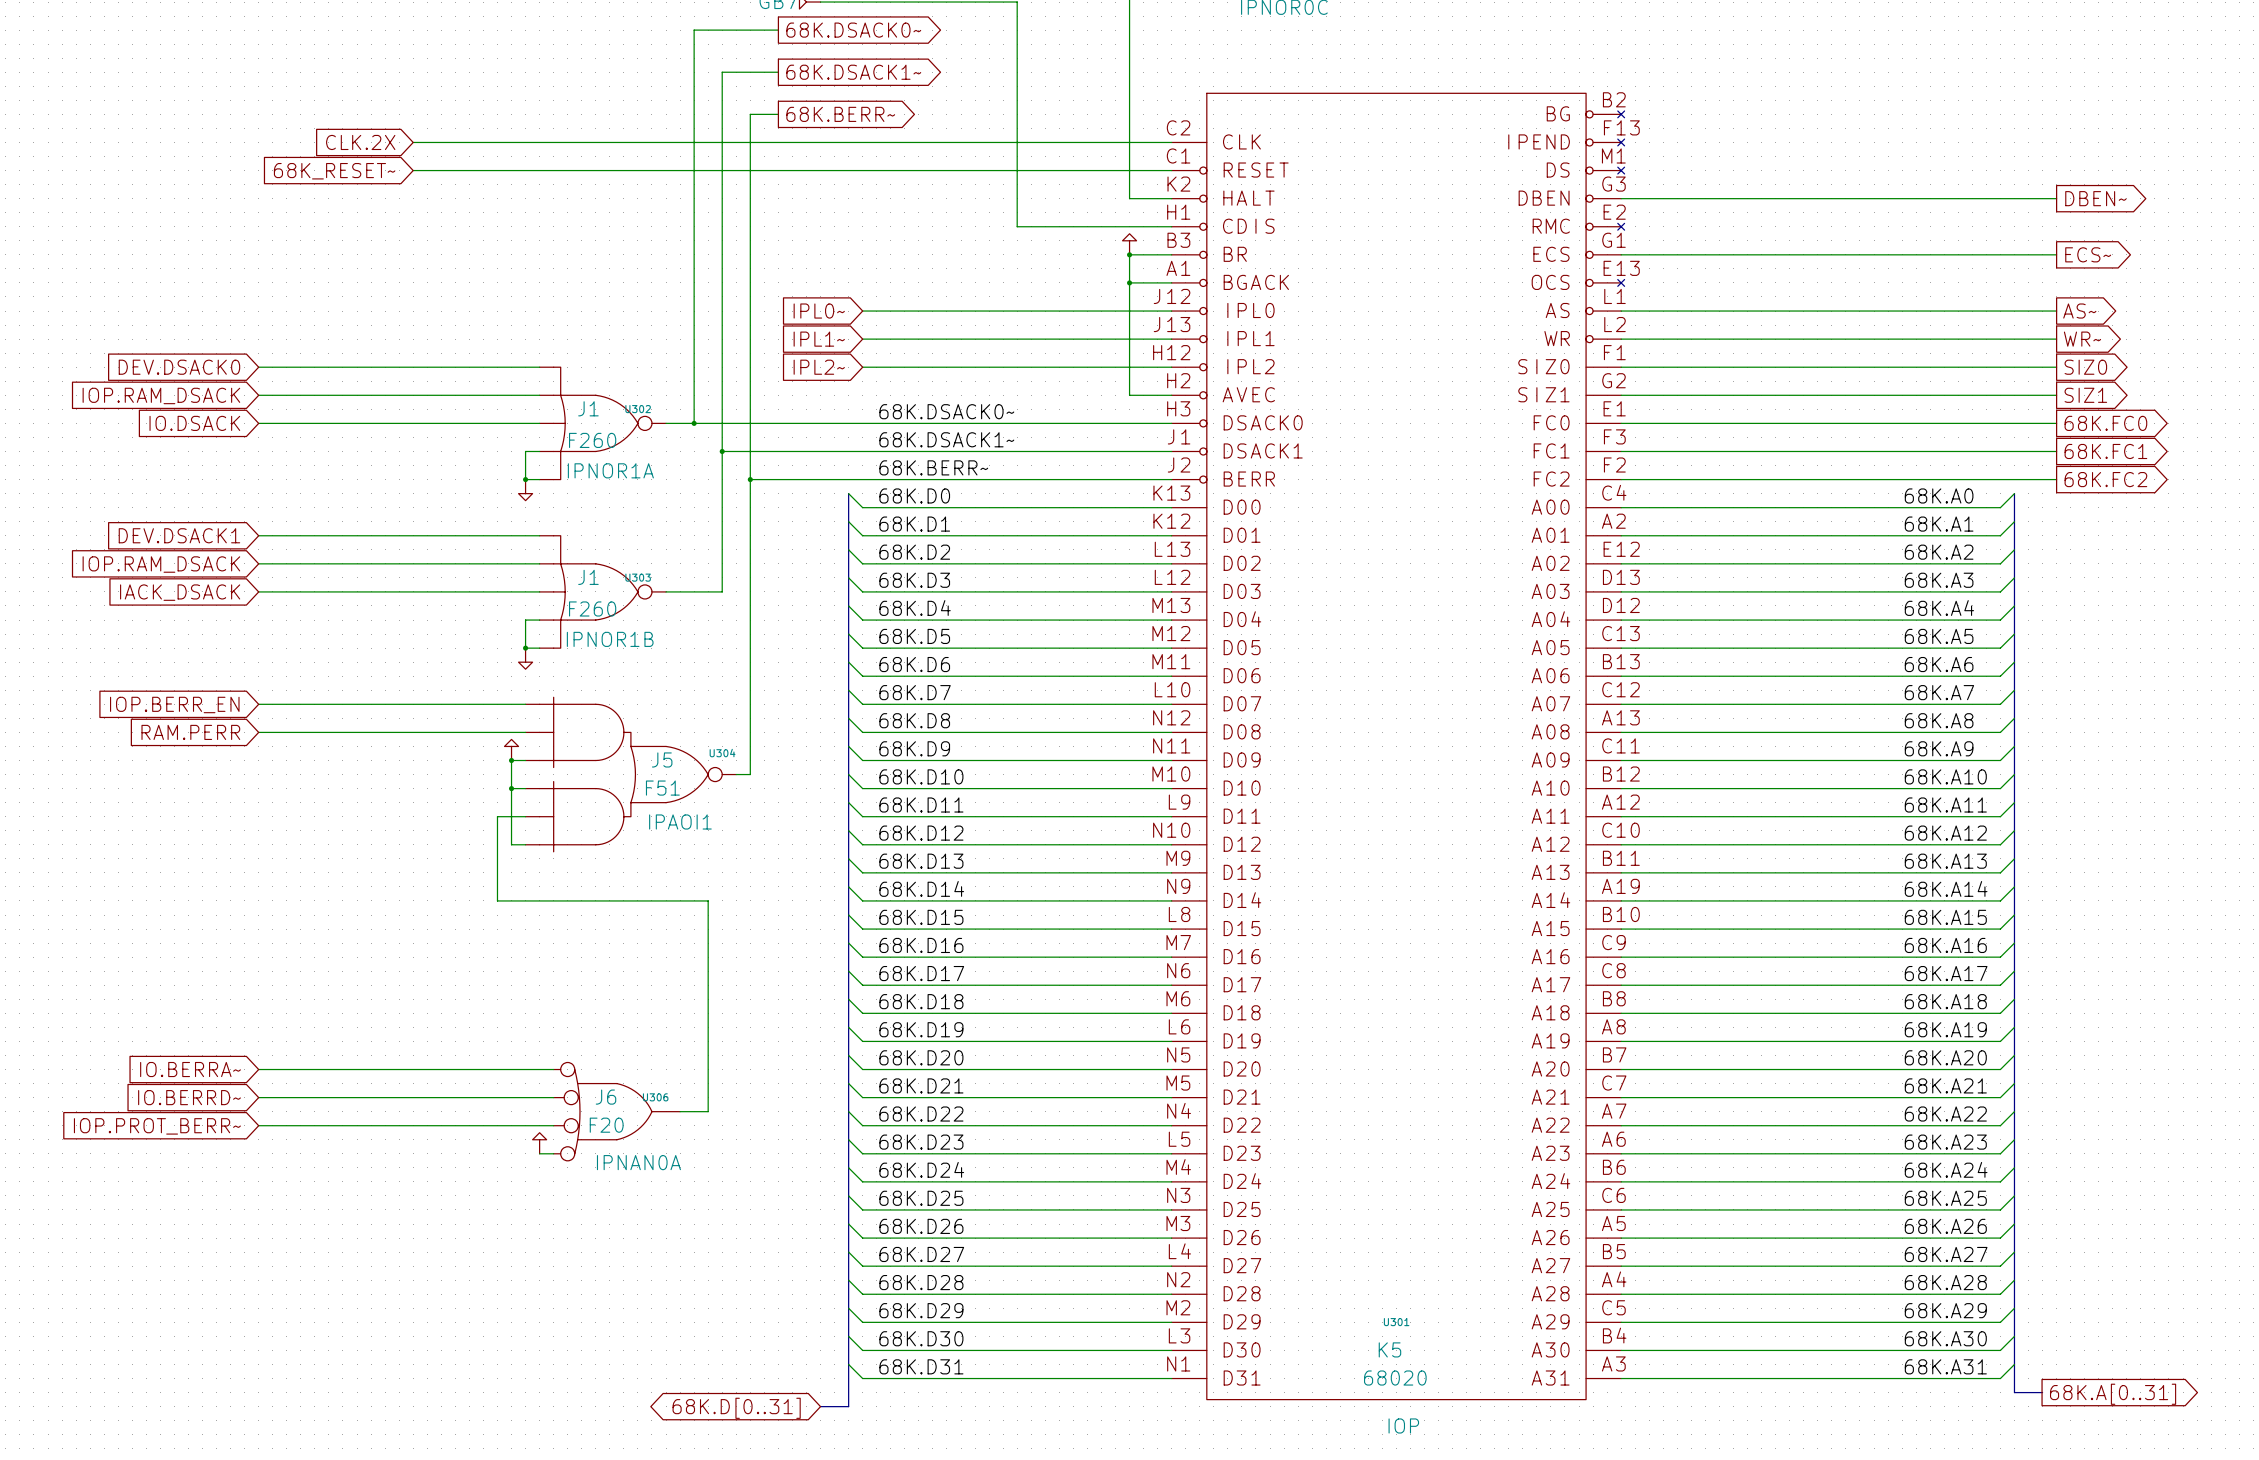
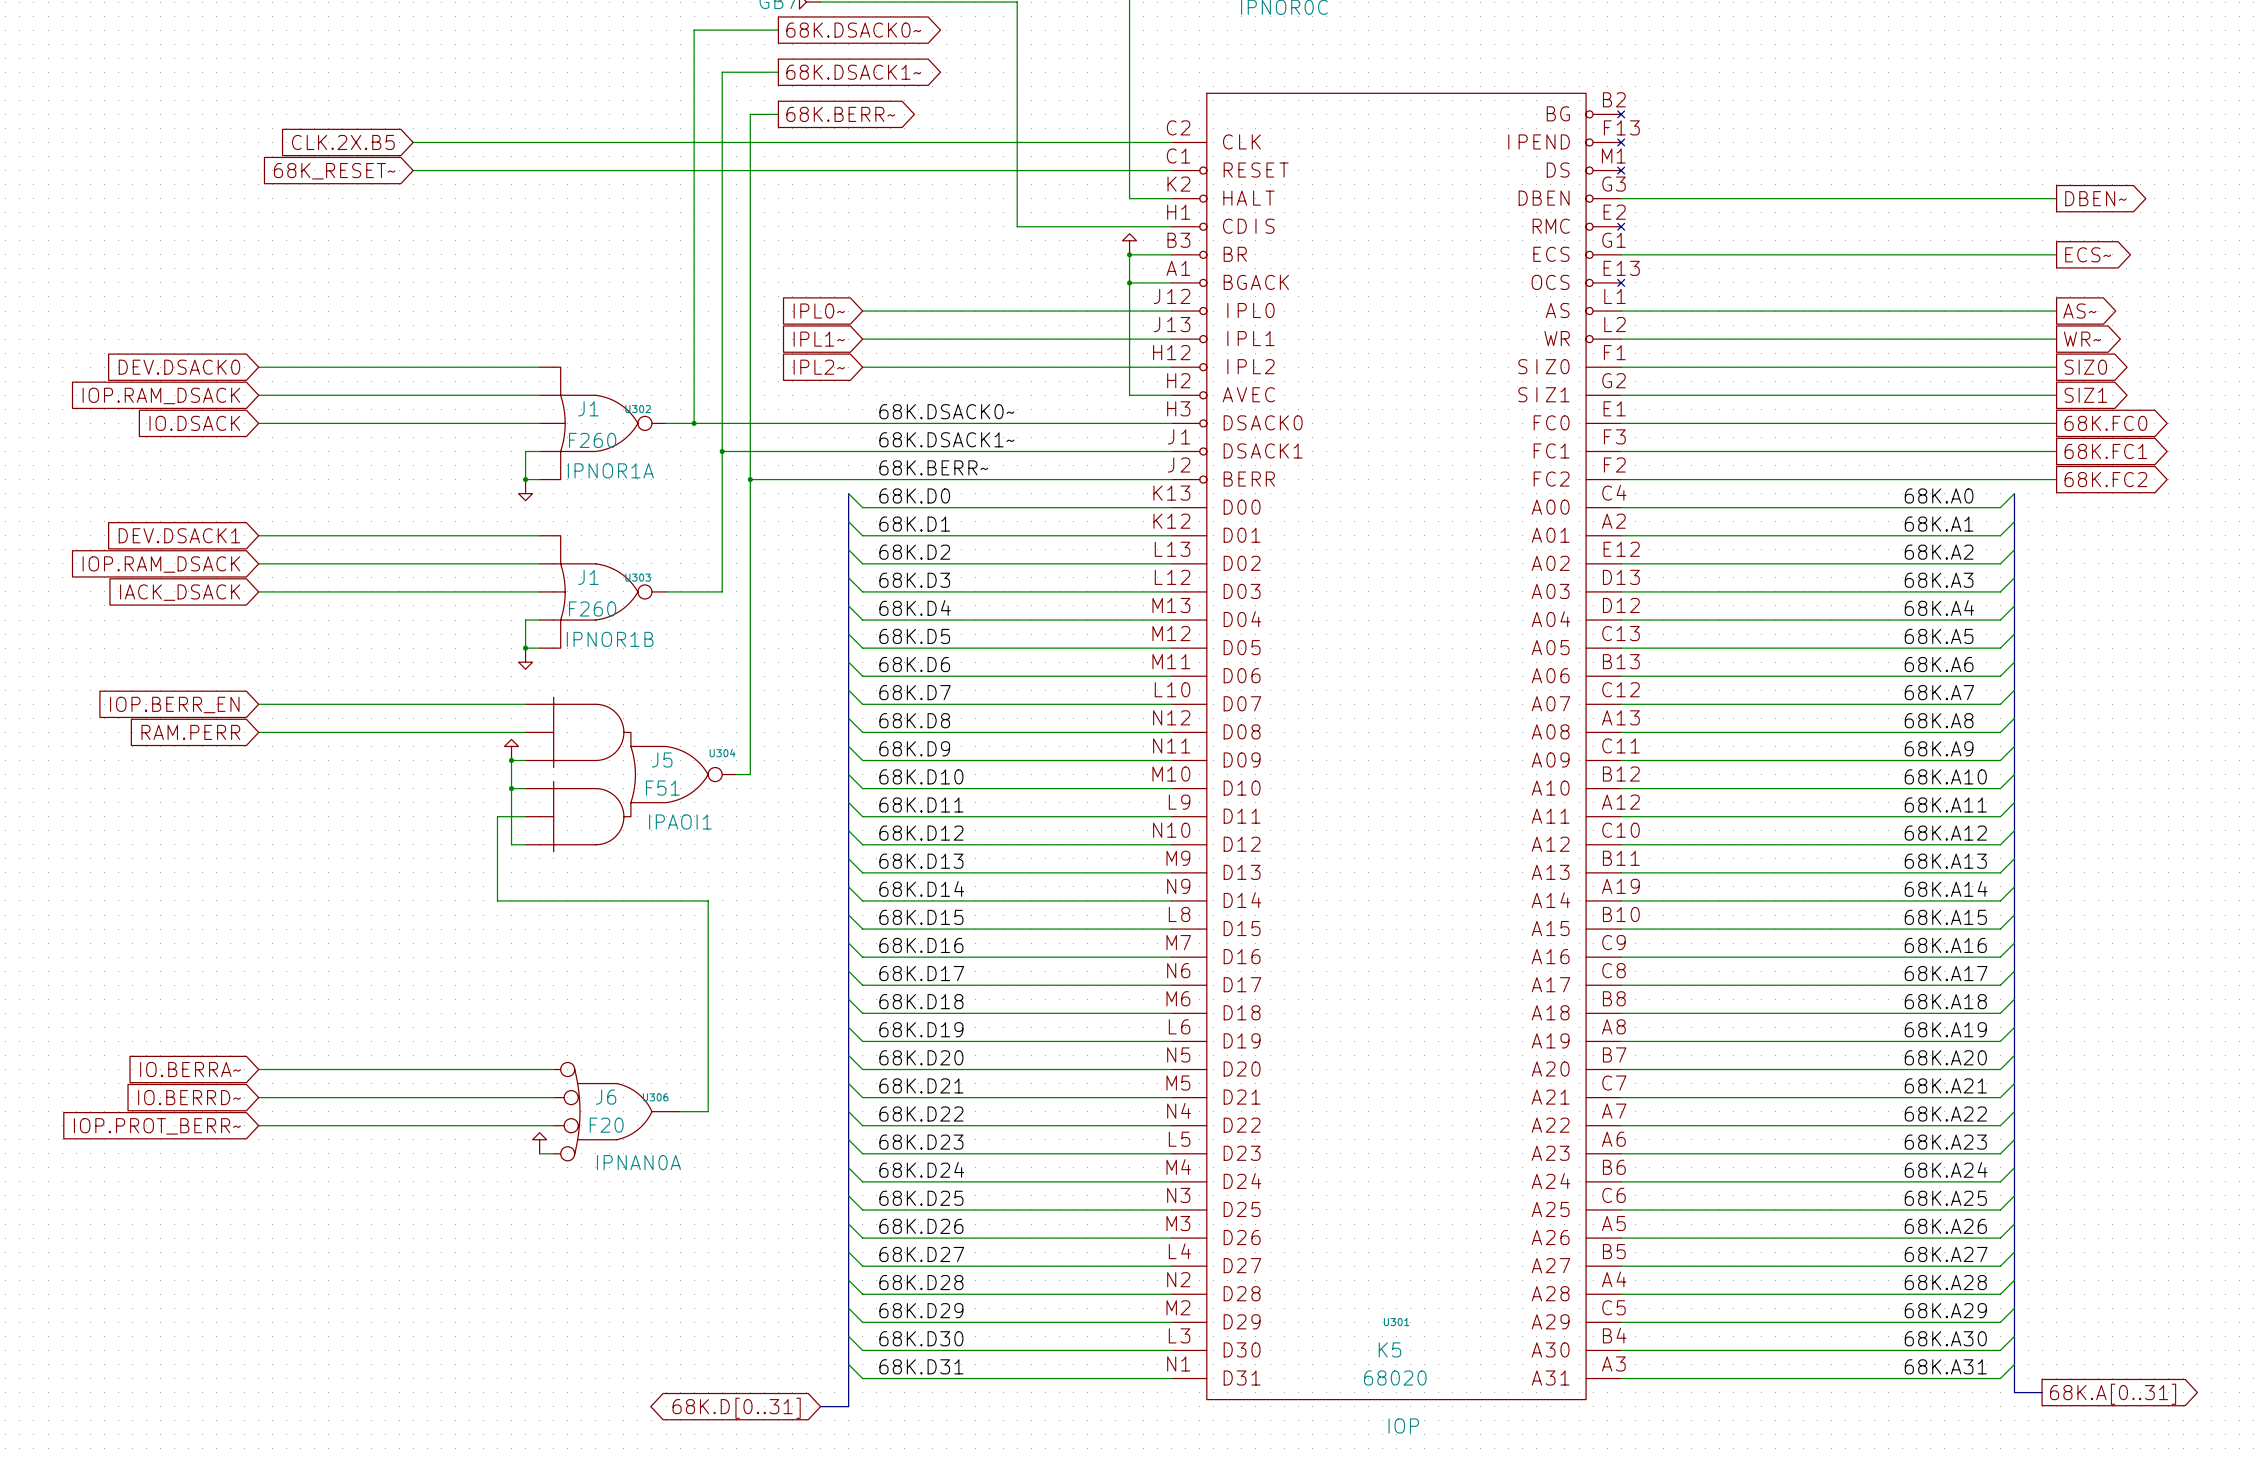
global label: CLK.2X (360, 142) -> CLK.2X.B5 (343, 142)

